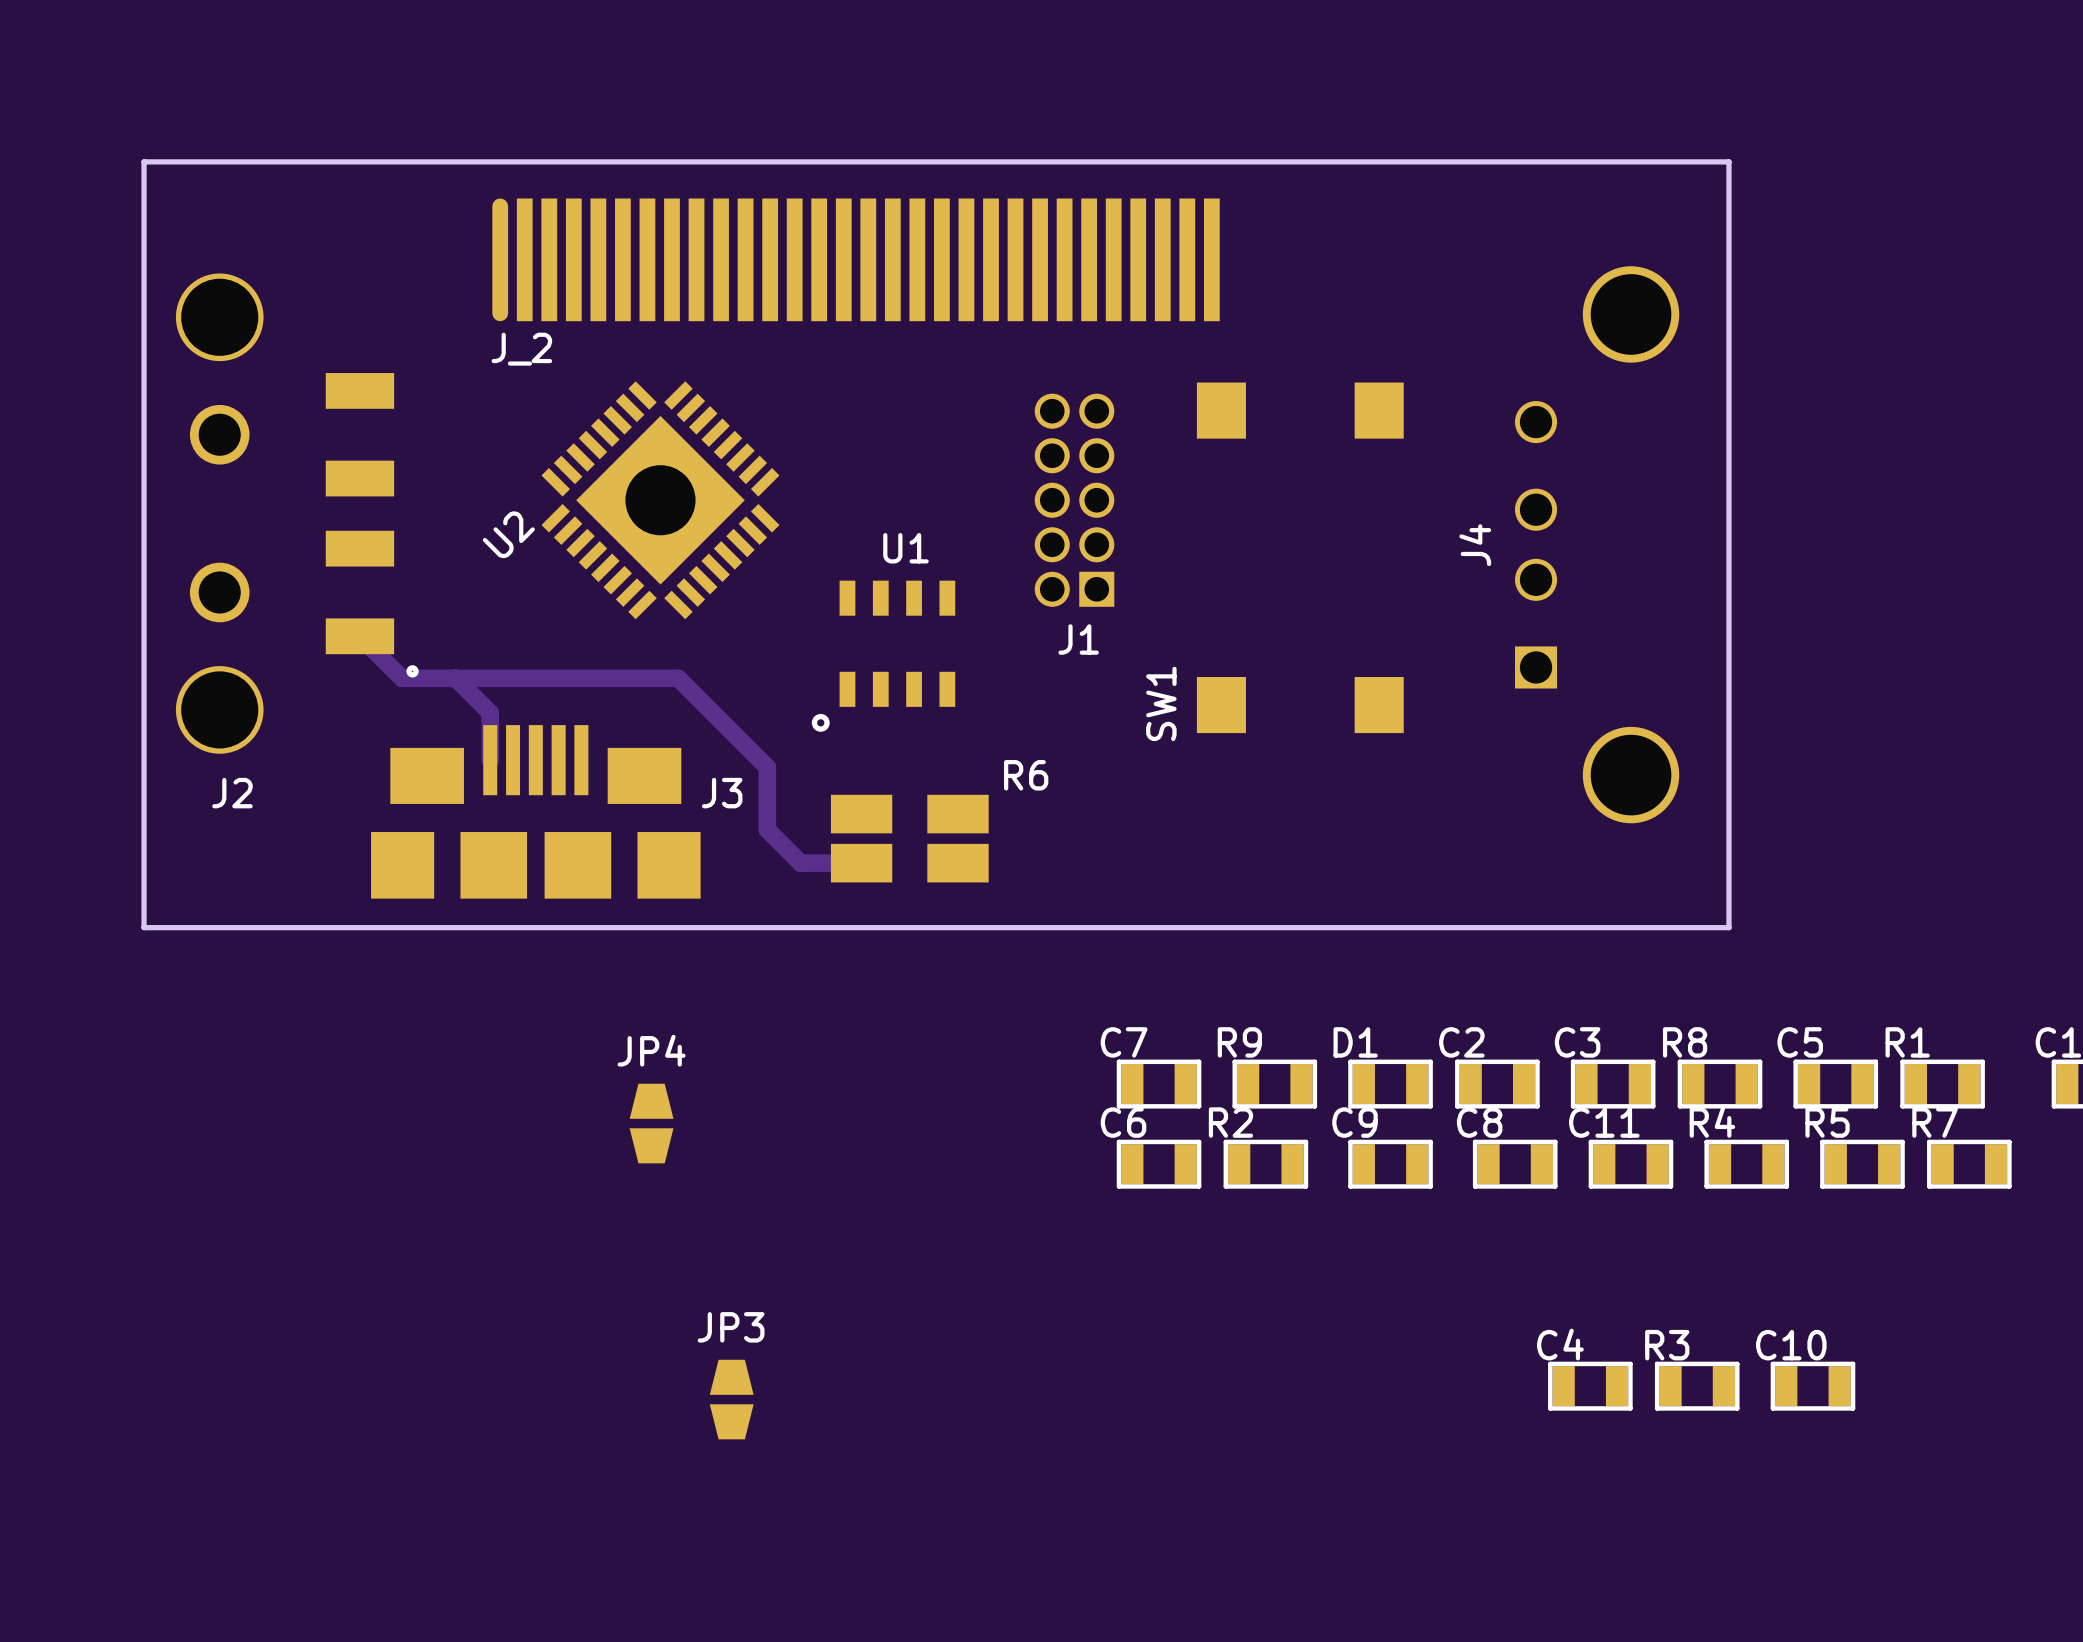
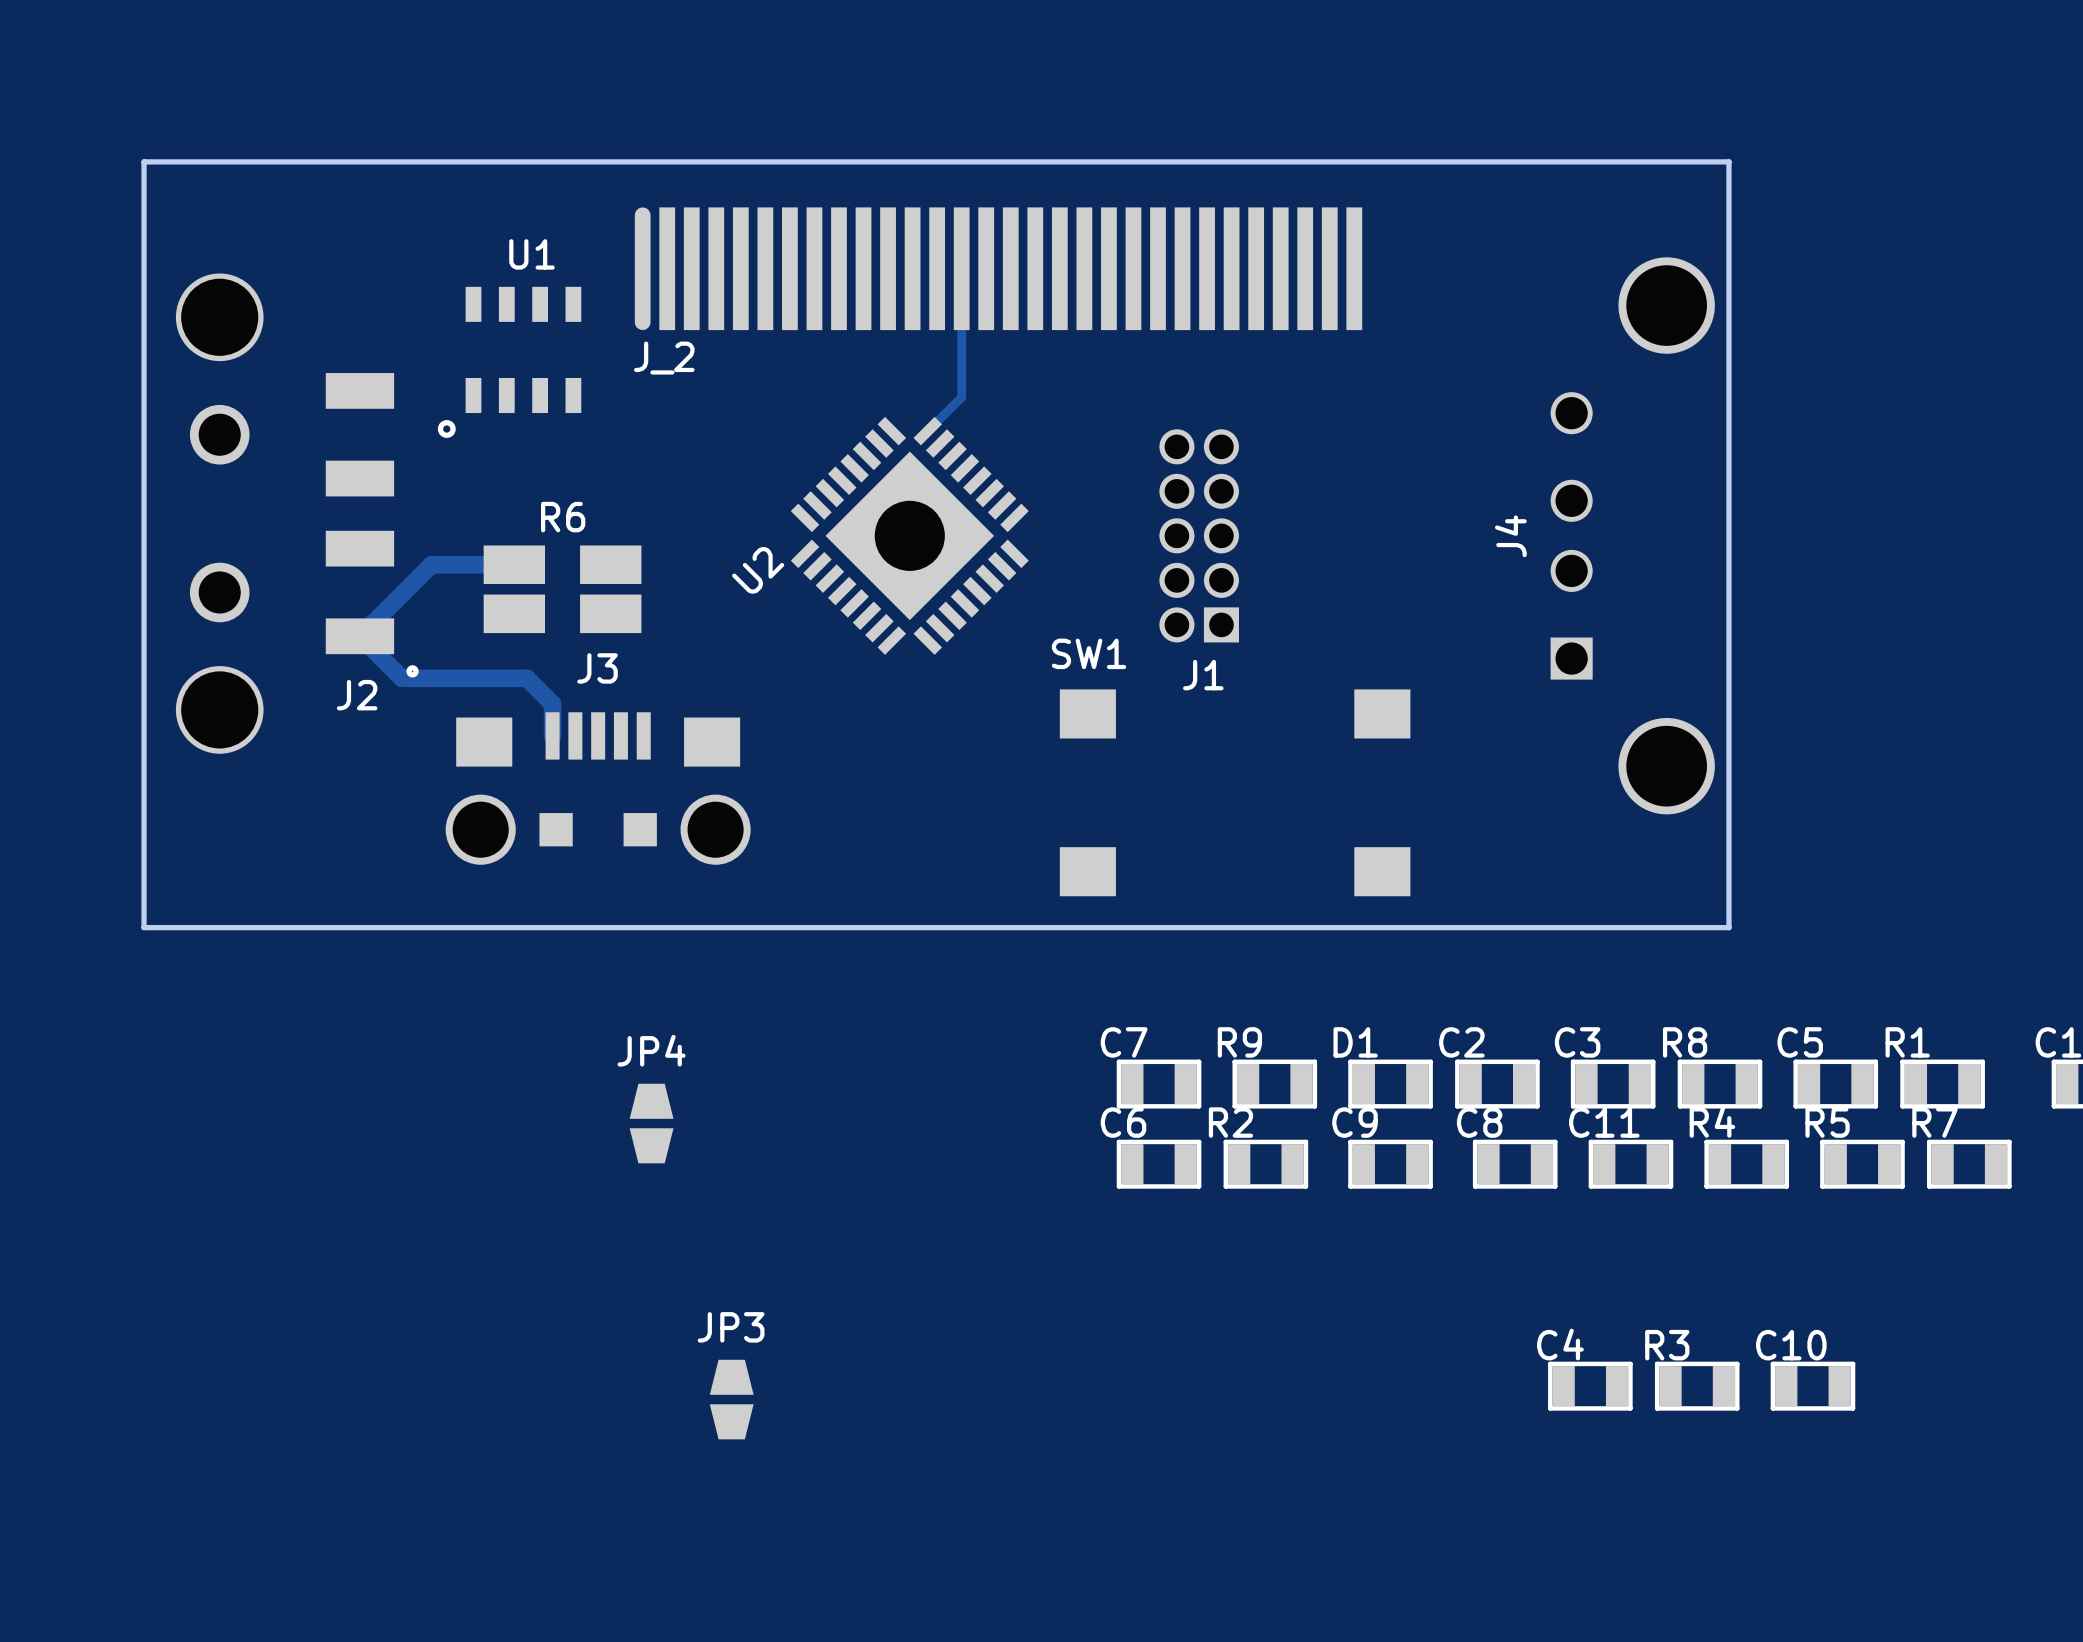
J_2 position: (856, 259) -> (998, 268)
track: none -> (961, 268) (961, 397) (927, 431)
U2 position: (660, 500) -> (909, 535)
J1 position: (1074, 500) -> (1199, 535)
J4 position: (1597, 544) -> (1632, 535)
SW1 rotation: 0° (1300, 557) -> 90° clockwise (1235, 792)
SW1 position: (1300, 557) -> (1235, 792)
track: none -> (514, 564) (431, 564) (359, 636)
U1 position: (883, 656) -> (509, 362)
track: (455, 678) (490, 712) (490, 760) -> none
track: (526, 678) (678, 678) (767, 767) (767, 829) (800, 863) (861, 863) -> (526, 678) (552, 703) (552, 735)
J3 footprint: [371, 725, 701, 899] -> [445, 712, 751, 865]
R6 name position: R6 (1026, 775) -> R6 (563, 517)
J2 name position: J2 (232, 793) -> J2 (357, 695)
J3 name position: J3 (722, 793) -> J3 (597, 668)
R6 position: (909, 838) -> (562, 589)

